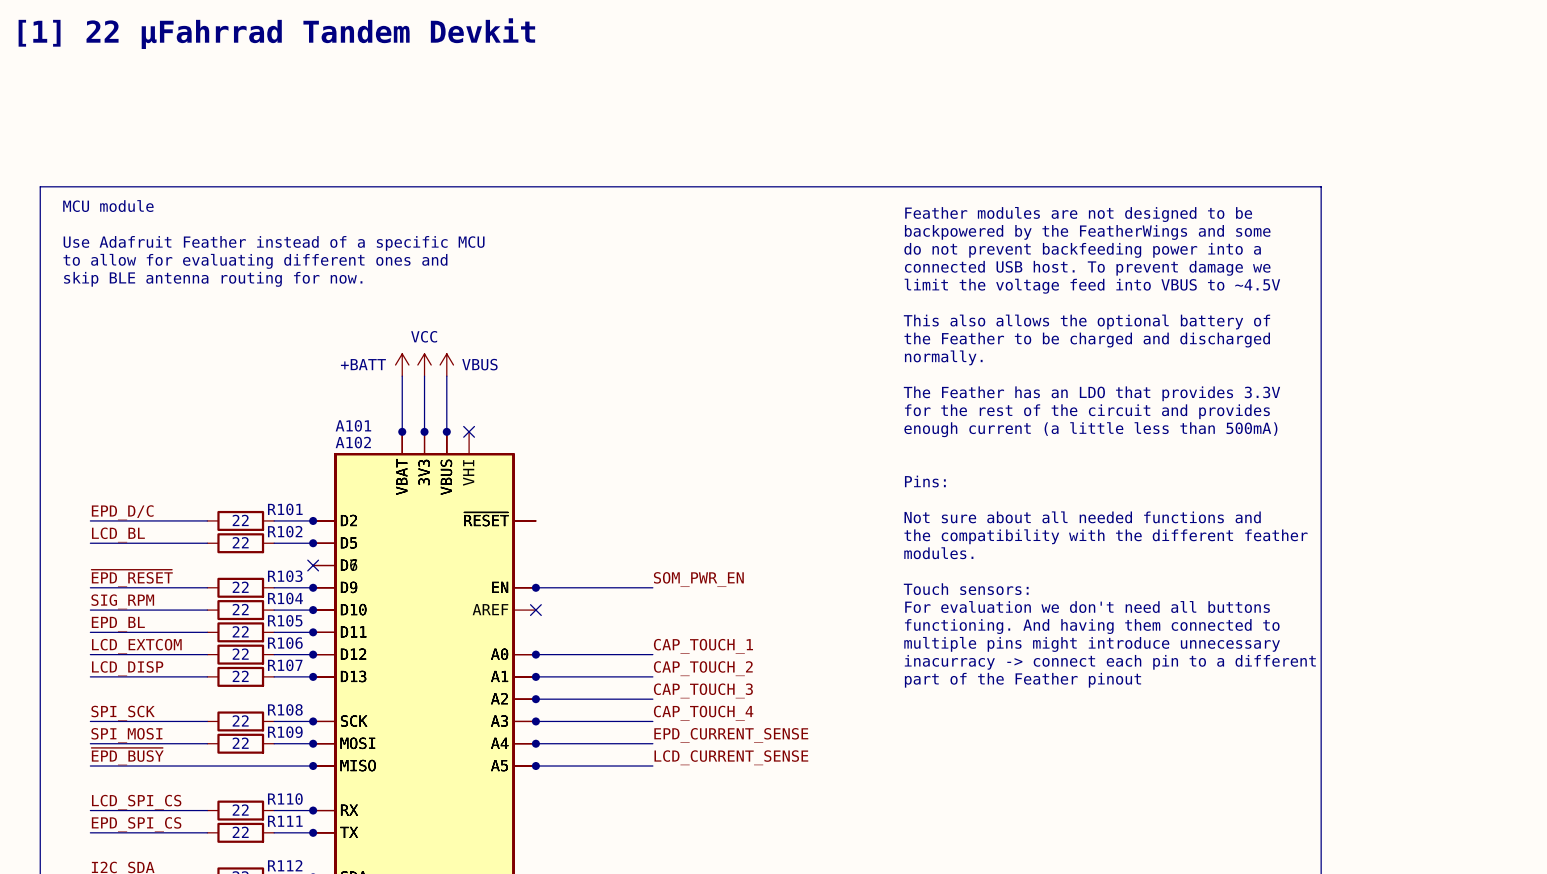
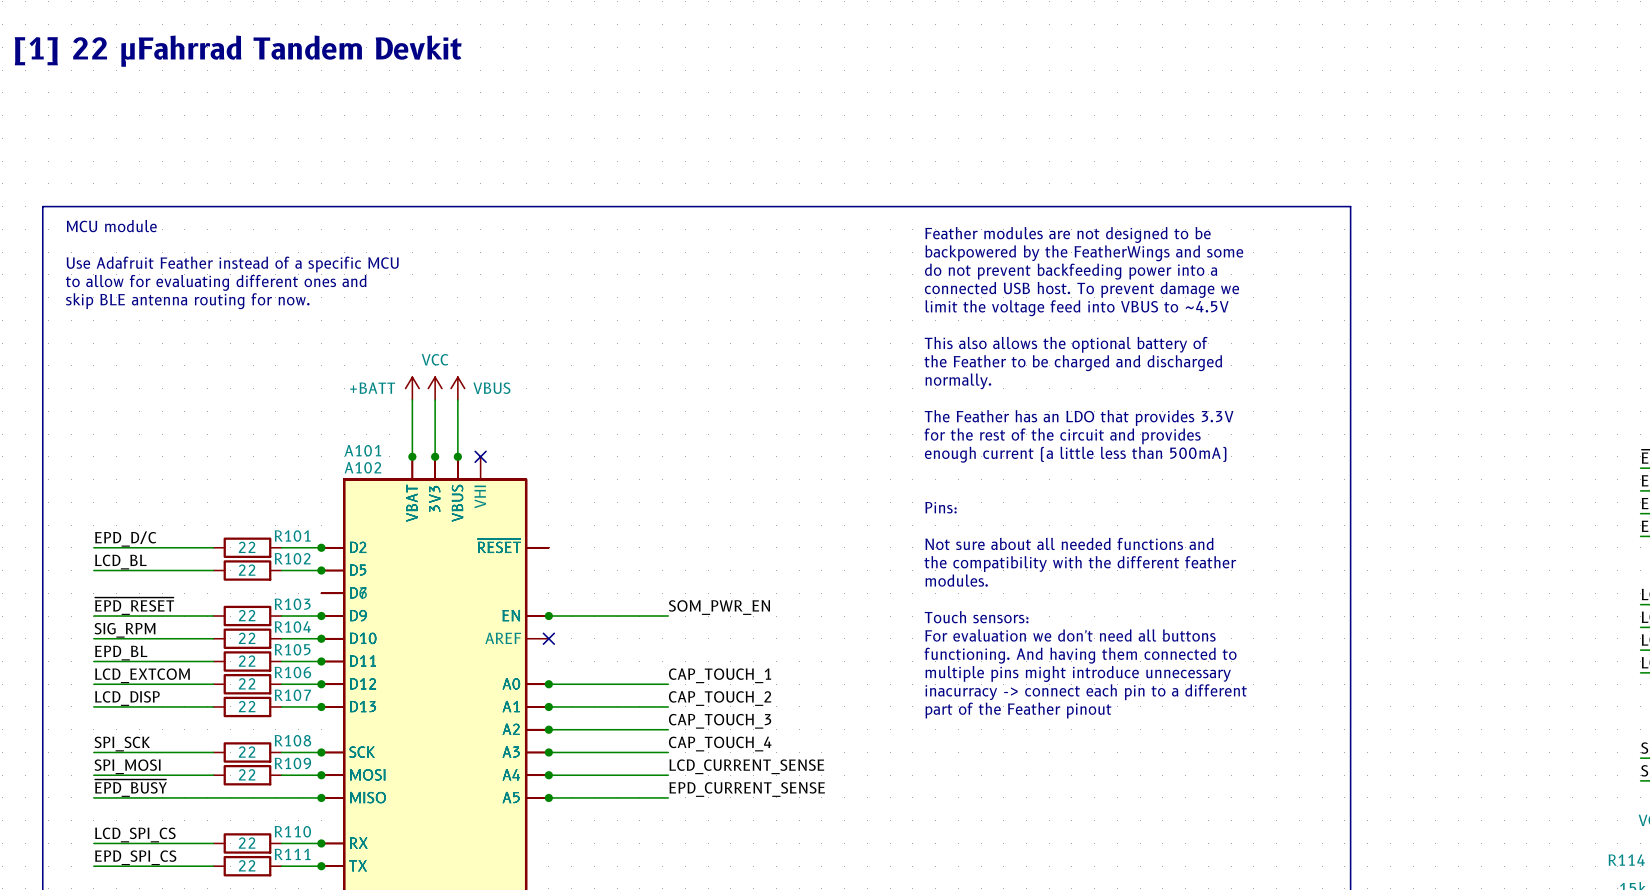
no-connect mark: (313, 565) -> none
label: EPD_CURRENT_SENSE (731, 735) -> LCD_CURRENT_SENSE (746, 766)
label: LCD_CURRENT_SENSE (731, 757) -> EPD_CURRENT_SENSE (747, 789)

